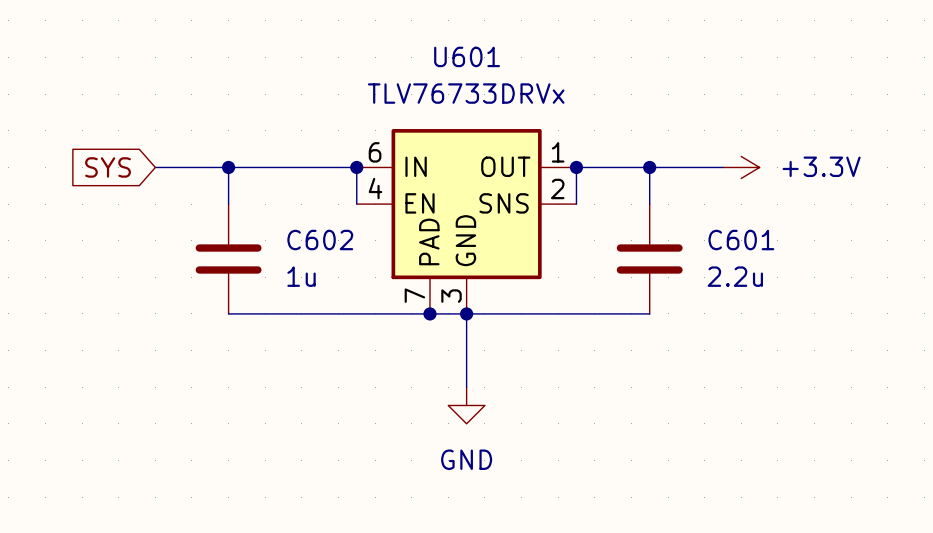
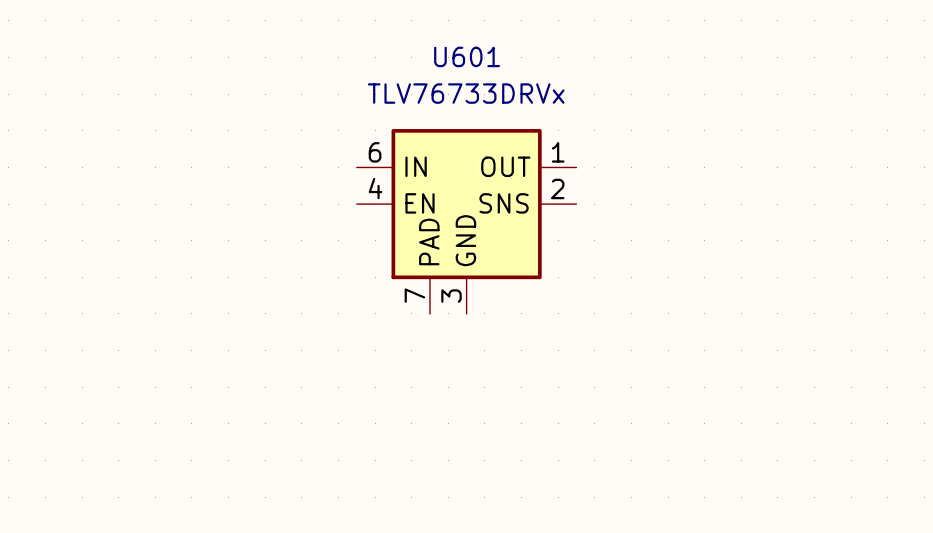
global label: SYS (108, 167) -> none
wire: (155, 167) (356, 167) (356, 204) -> none
wire: (228, 167) (228, 204) -> none
junction: (228, 167) -> none
junction: (356, 167) -> none
junction: (576, 167) -> none
wire: (649, 167) (649, 204) -> none
junction: (649, 167) -> none
wire: (722, 167) (576, 167) (576, 204) -> none
power symbol: +3.3V (741, 167) -> none
C602: 1u (228, 259) -> none
C601: 2.2u (649, 259) -> none
wire: (228, 313) (649, 313) -> none
junction: (429, 313) -> none
wire: (466, 313) (466, 387) -> none
junction: (466, 313) -> none
power symbol: GND (466, 405) -> none

